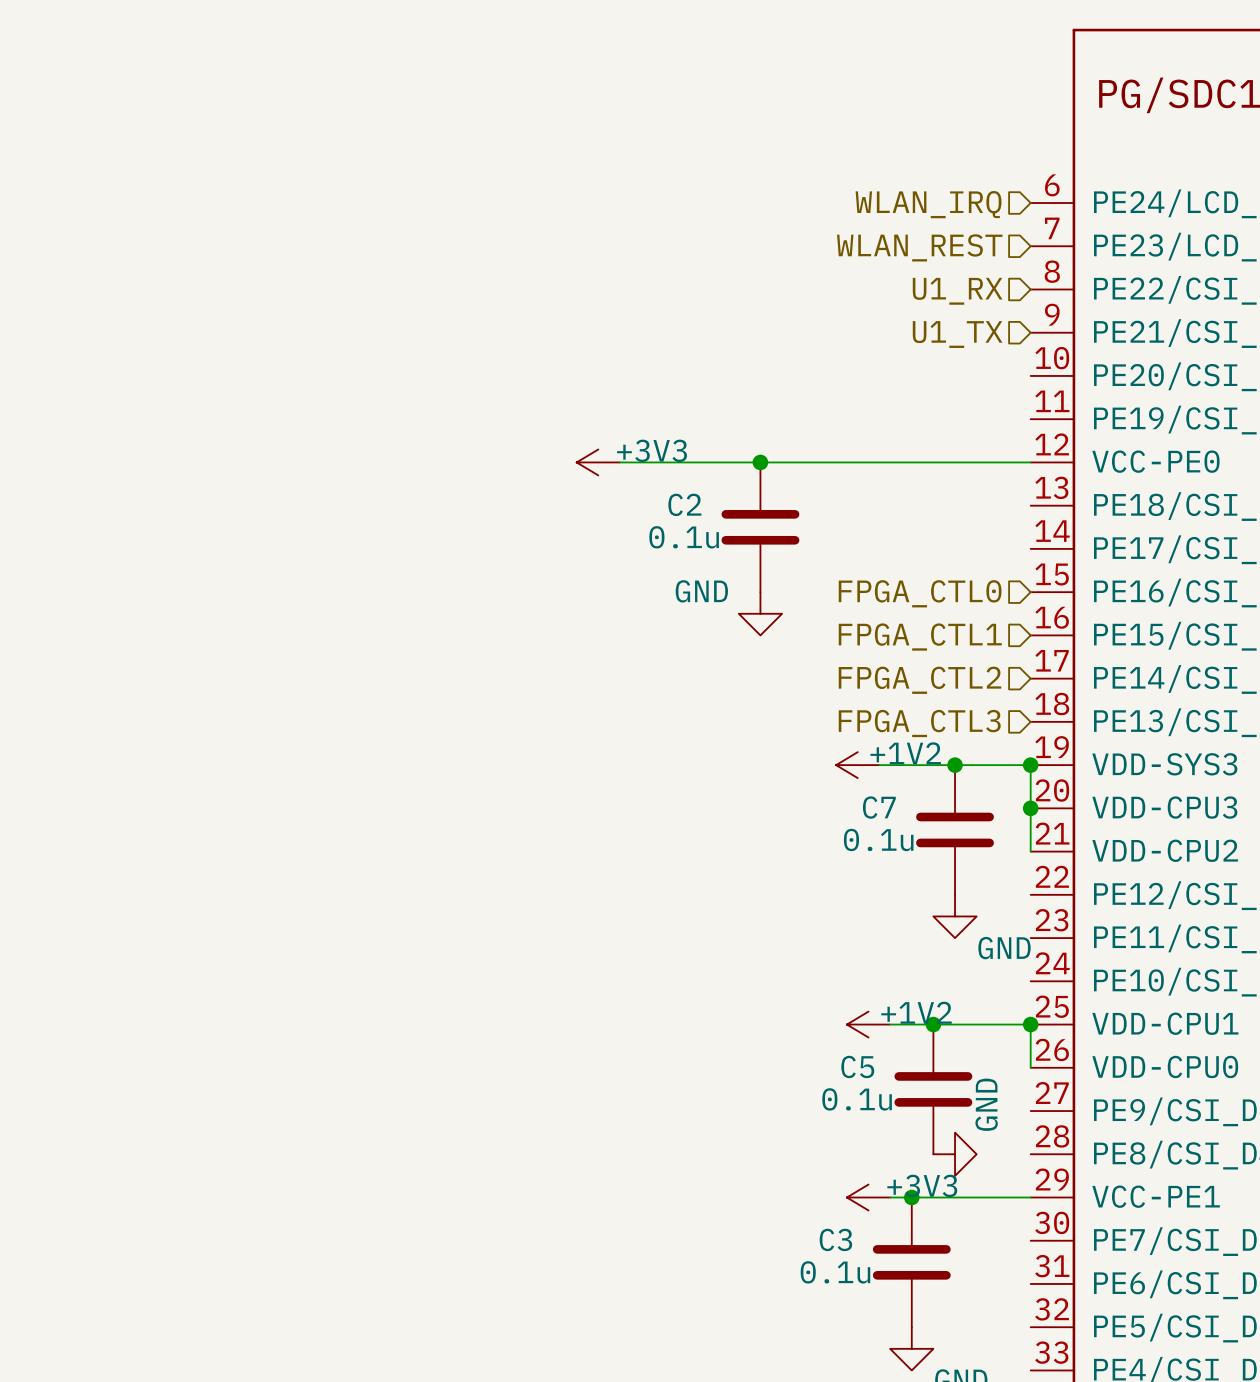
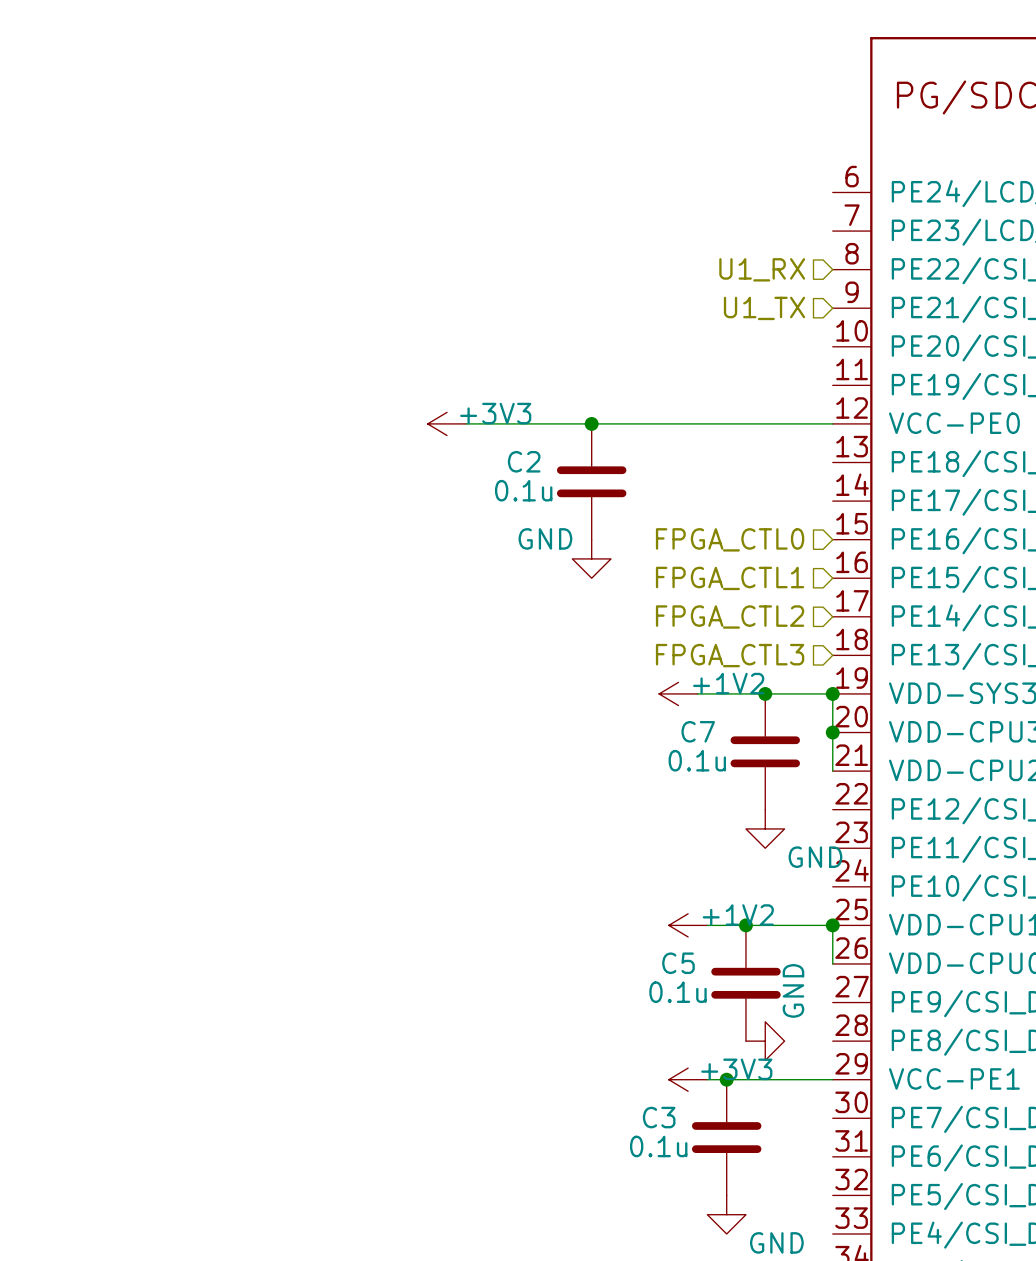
hierarchical label: WLAN_IRQ (928, 204) -> none
hierarchical label: WLAN_REST (919, 247) -> none

